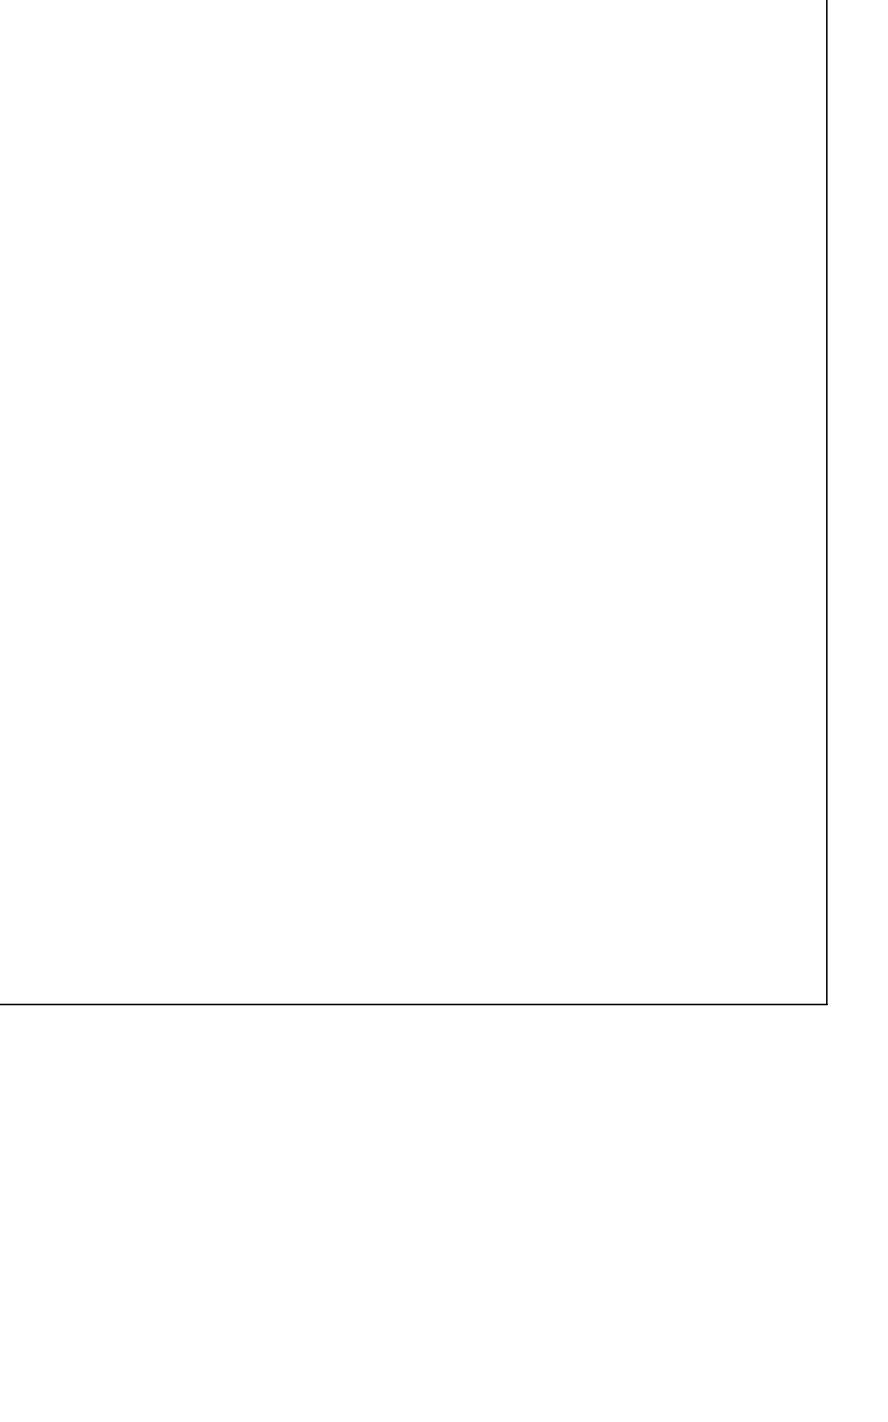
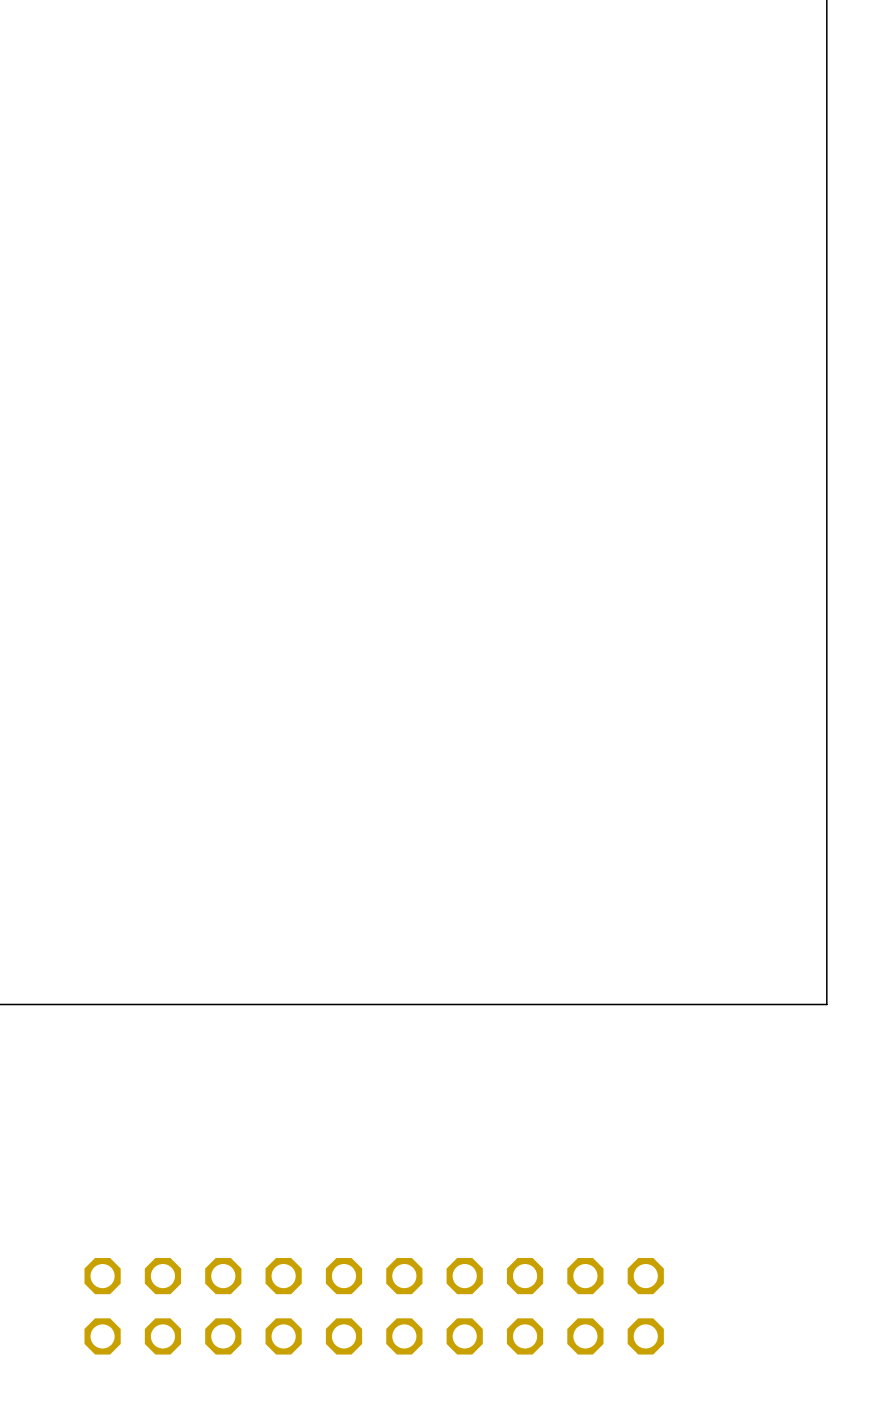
part: none -> (374, 1306)

